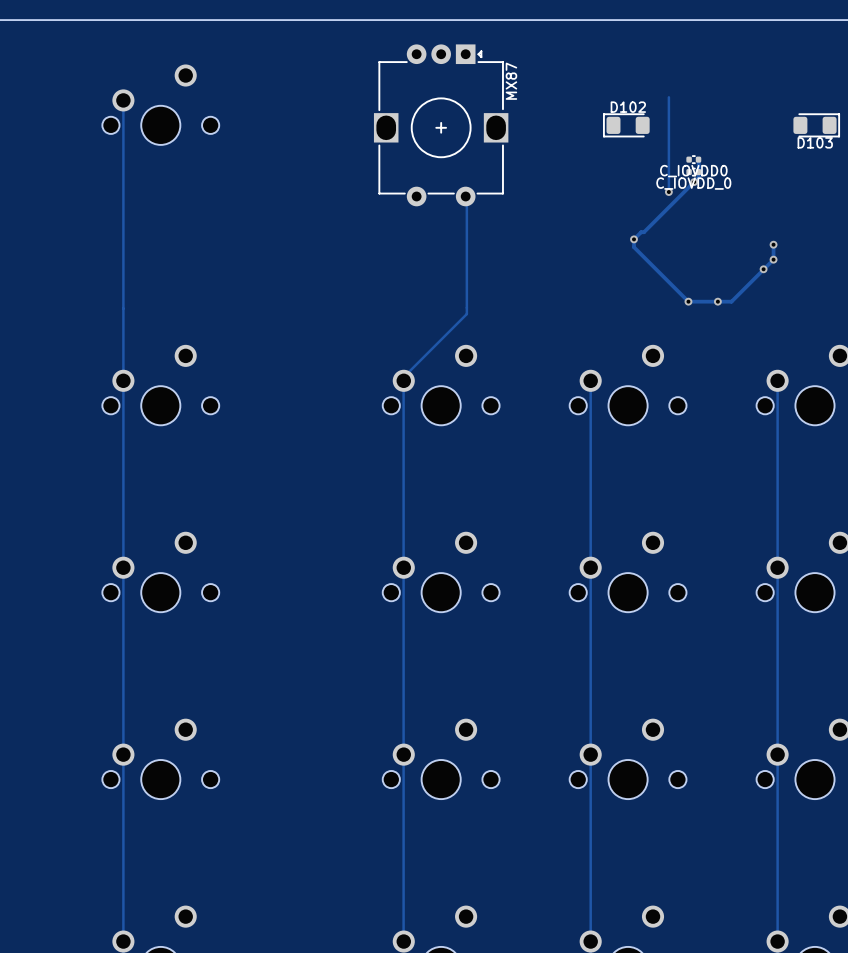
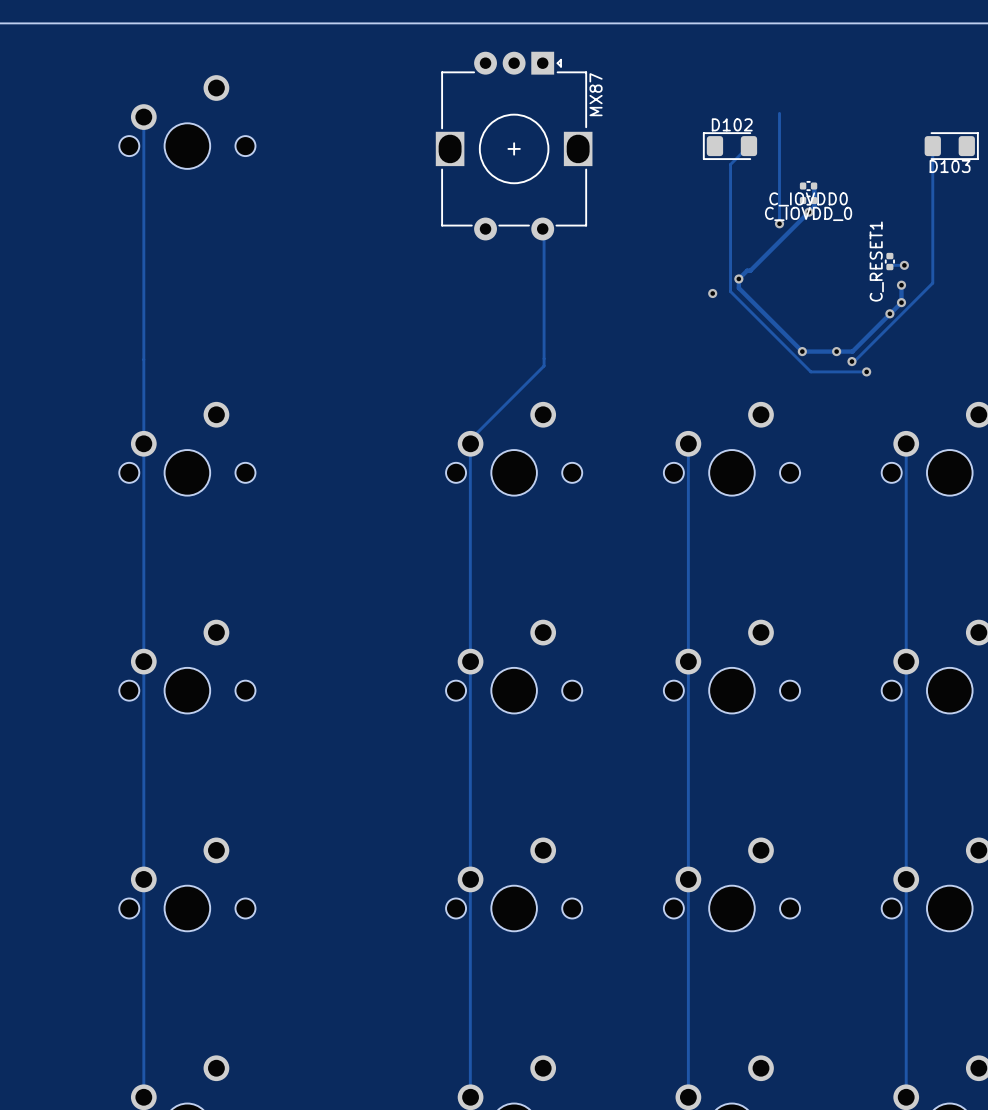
track: none -> (748, 146) (730, 164) (730, 291) (810, 371) (866, 371)
track: none -> (932, 146) (932, 283) (854, 361) (851, 361)
C_RESET1: none -> (889, 261)
track: none -> (904, 265) (889, 267)
via: none -> (904, 265)
via: none -> (712, 293)
via: none -> (851, 361)
via: none -> (866, 371)

